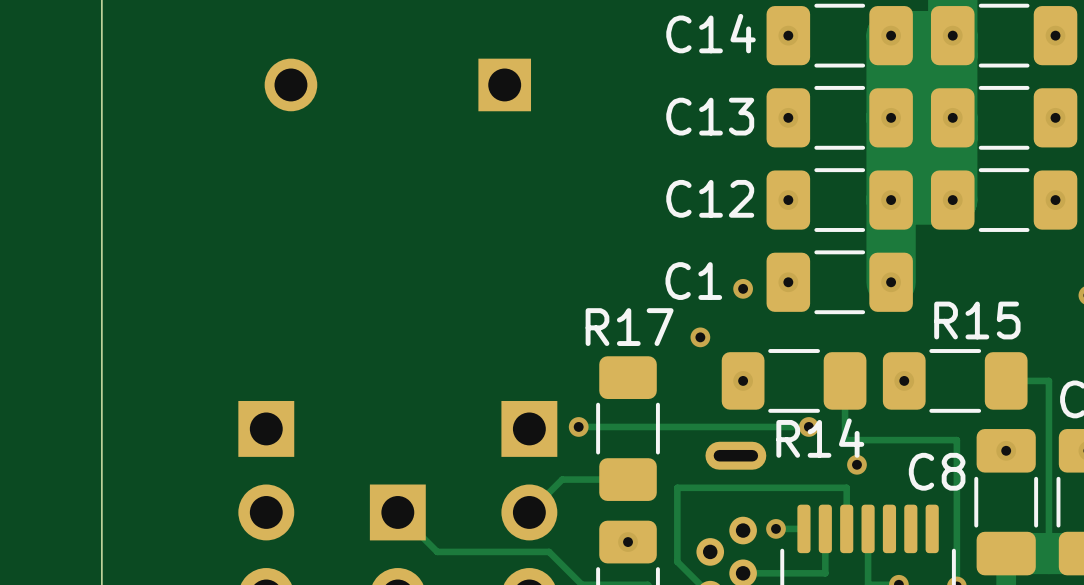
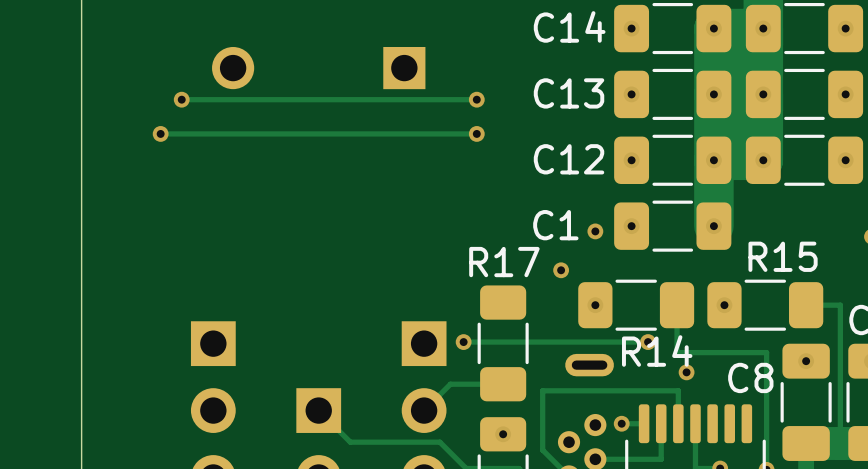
via: none -> (181, 99)
track: none -> (476, 99) (181, 99)
via: none -> (476, 99)
via: none -> (160, 133)
track: none -> (476, 133) (160, 133)
via: none -> (476, 133)

